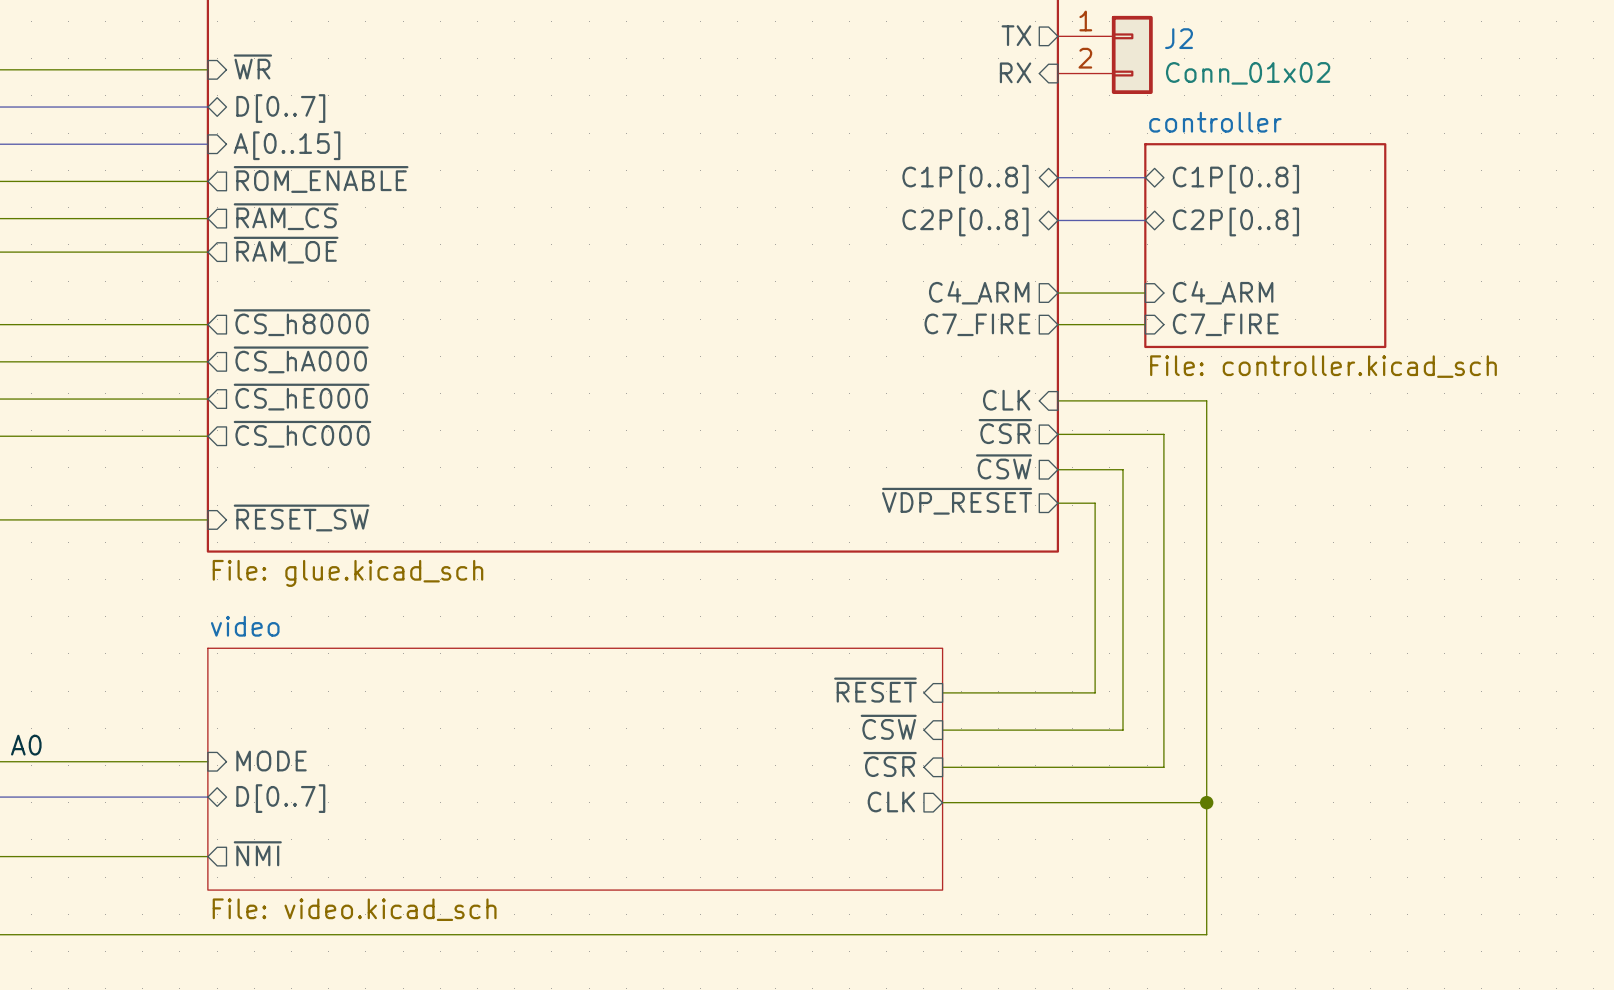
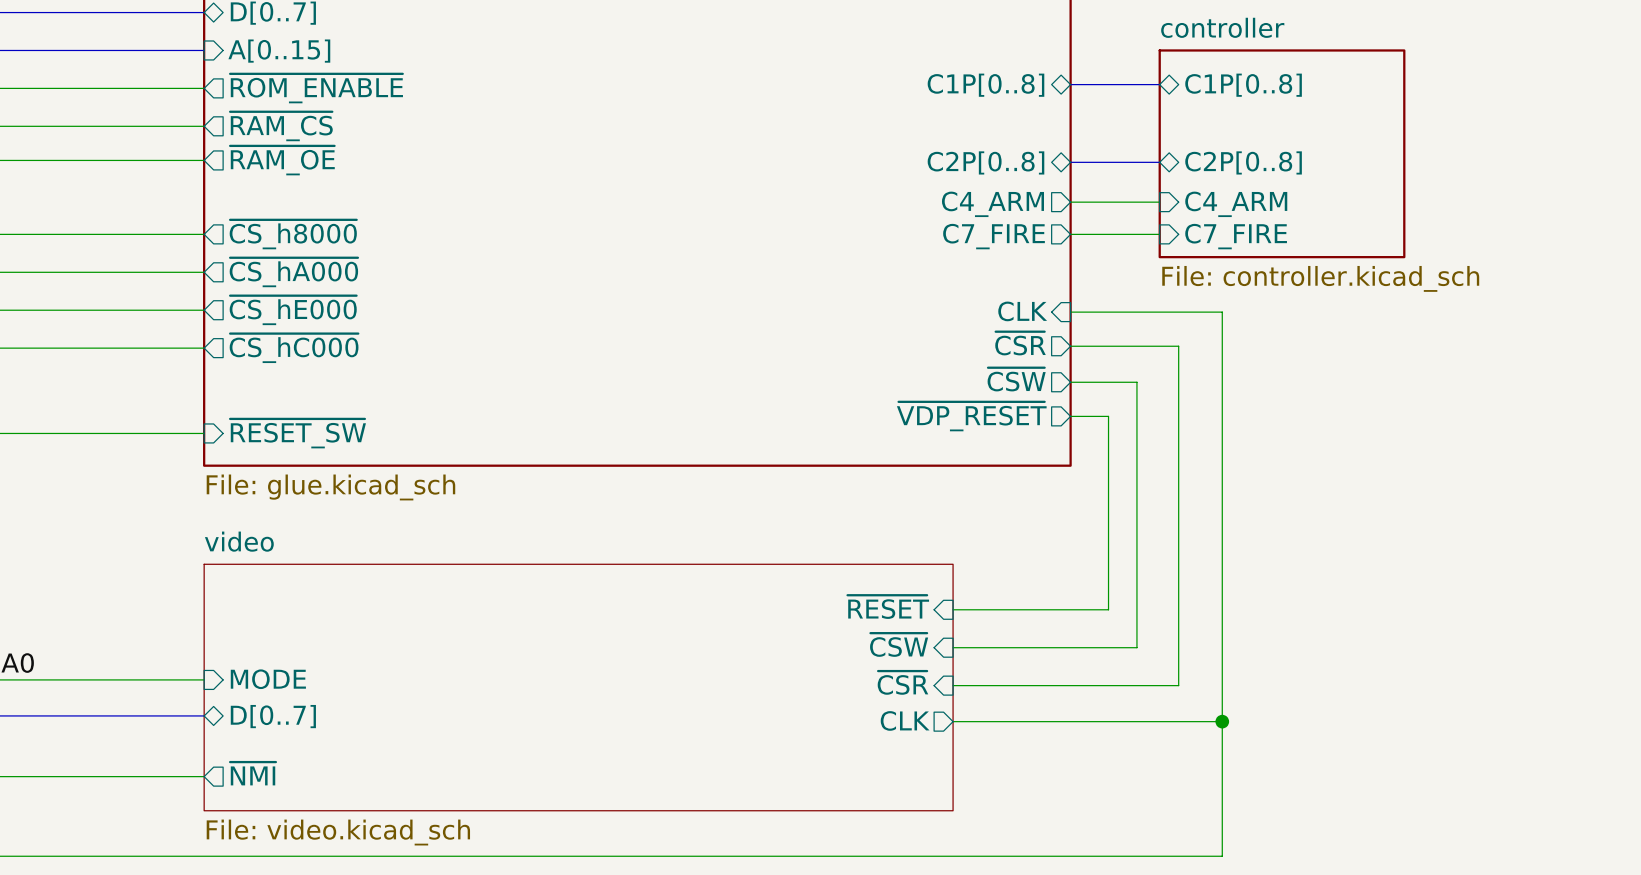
bus: (1057, 220) (1145, 220) -> (1070, 162) (1159, 162)
sheet pin position: C2P[0..8] (965, 221) -> C2P[0..8] (985, 162)
sheet pin position: C2P[0..8] (1235, 221) -> C2P[0..8] (1243, 162)

